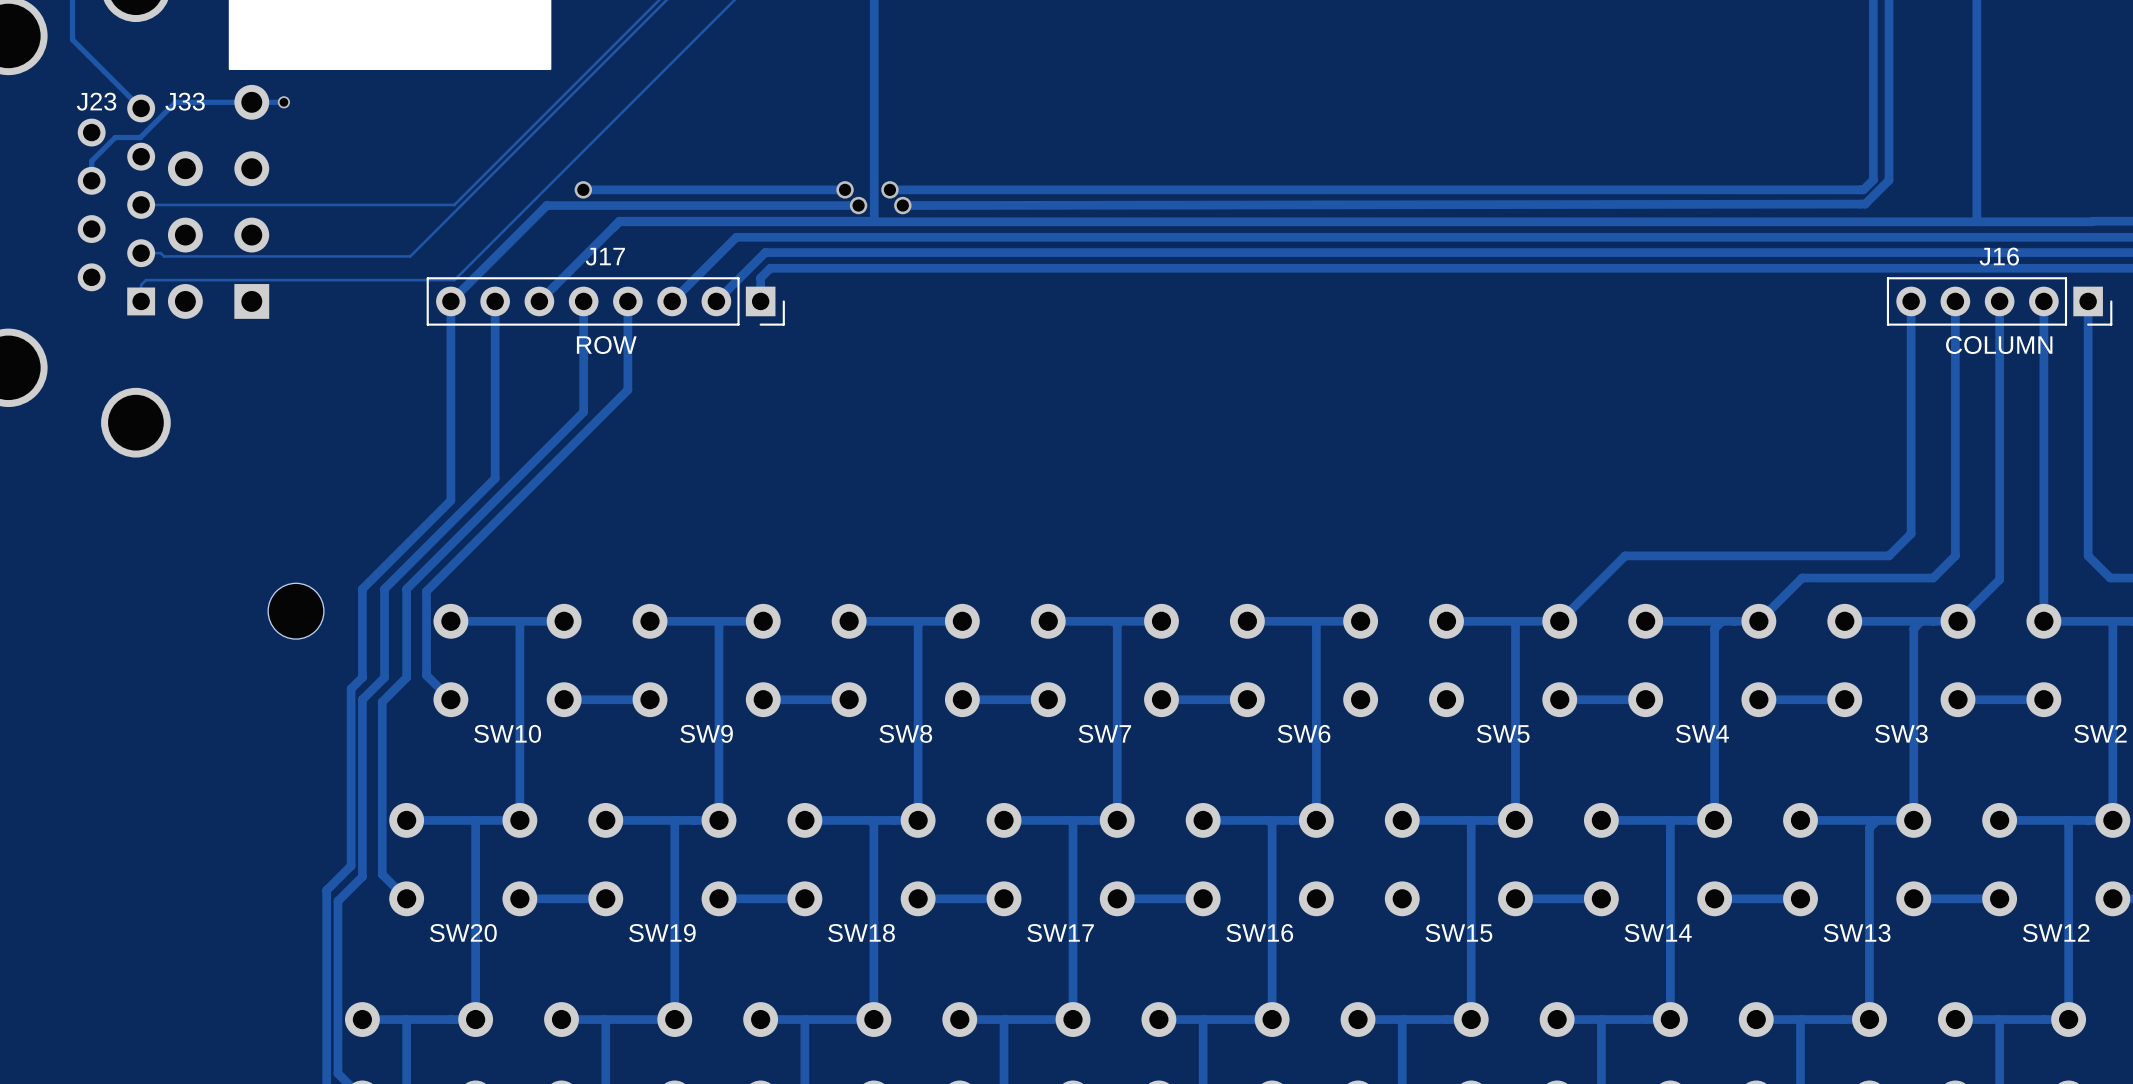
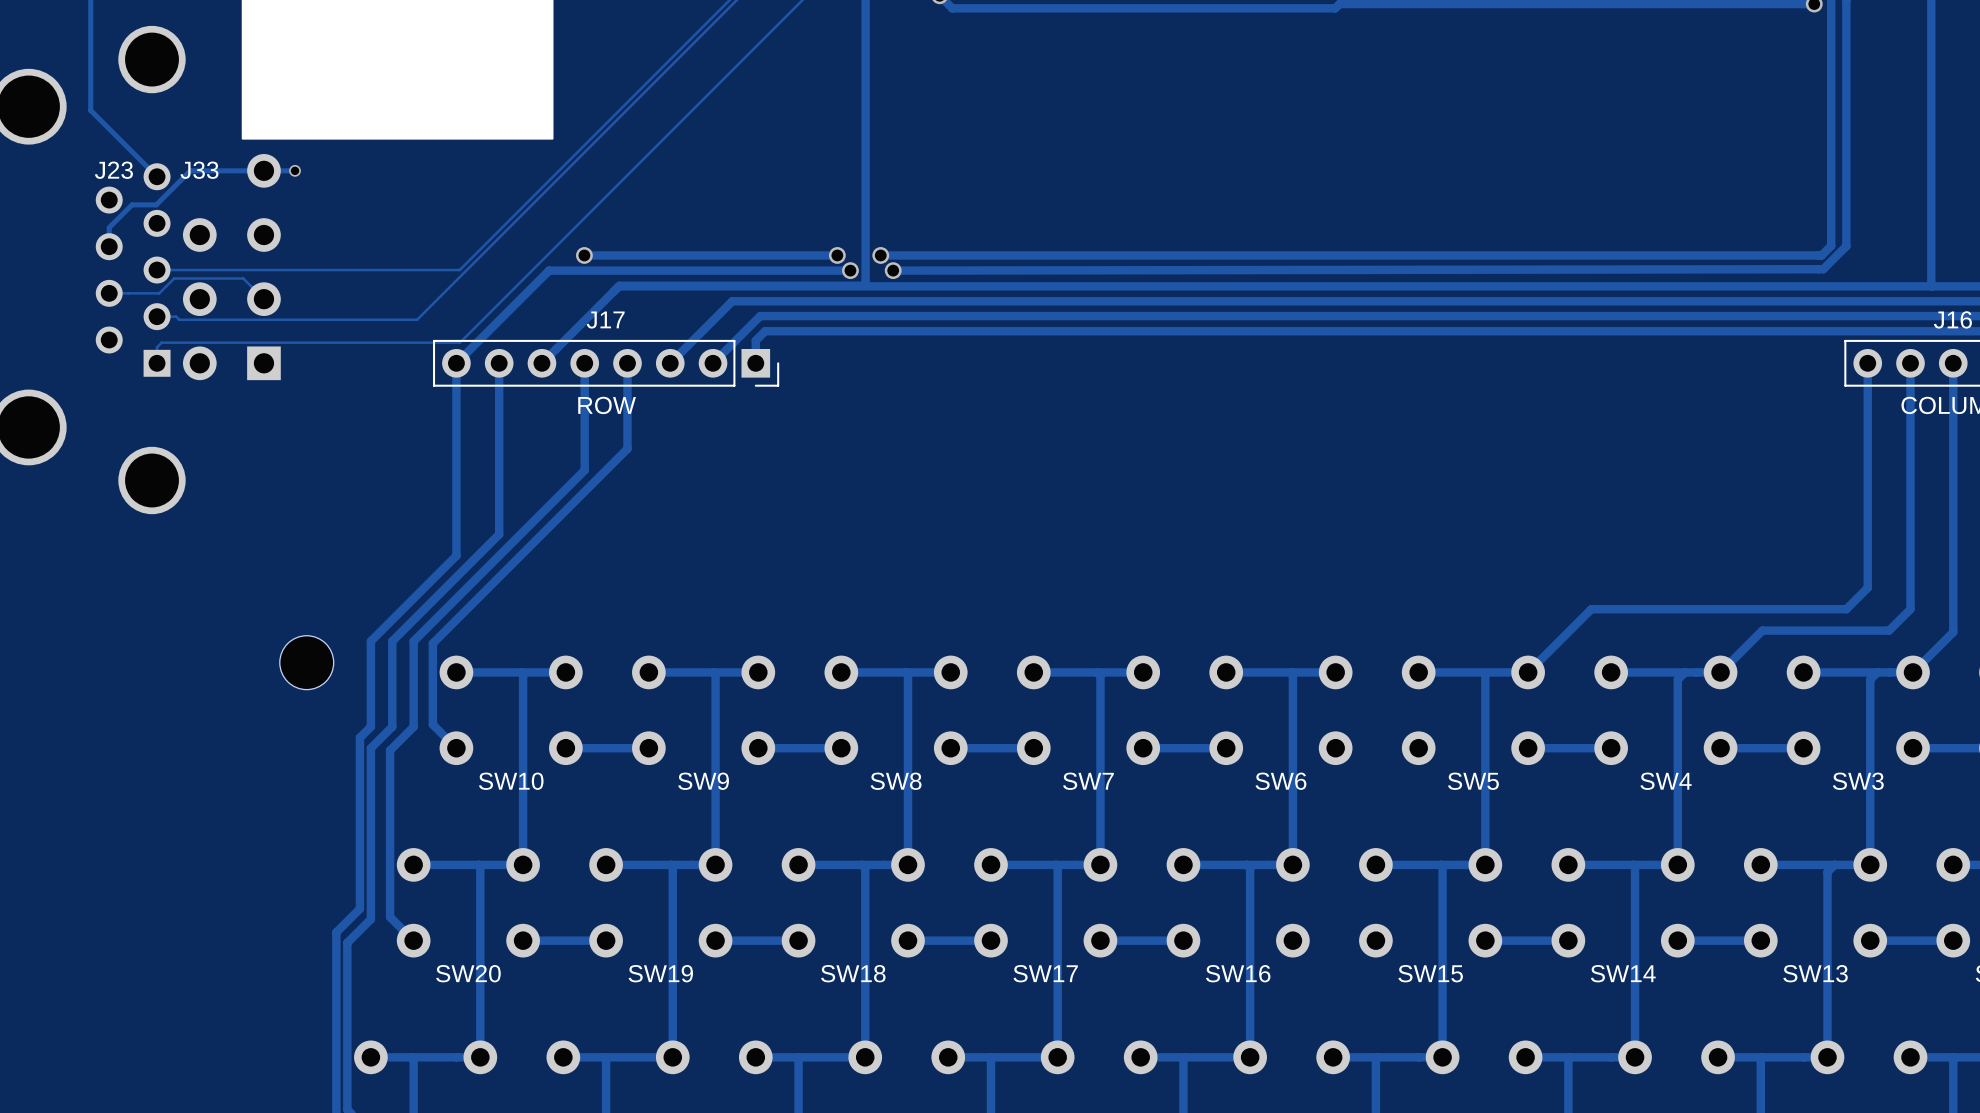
track: none -> (109, 293) (159, 293) (174, 278) (243, 278) (263, 299)

